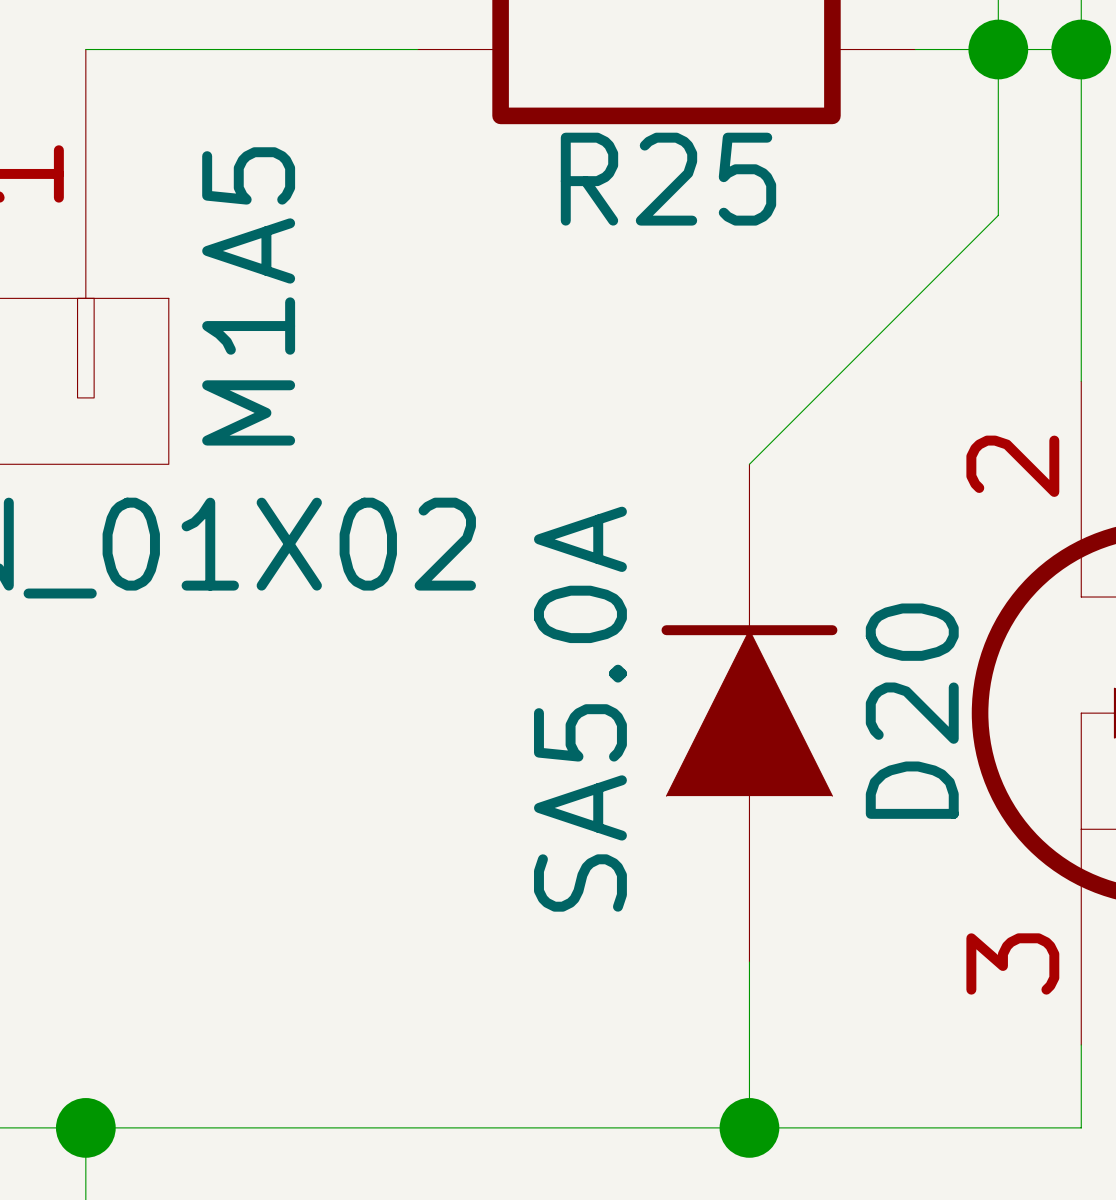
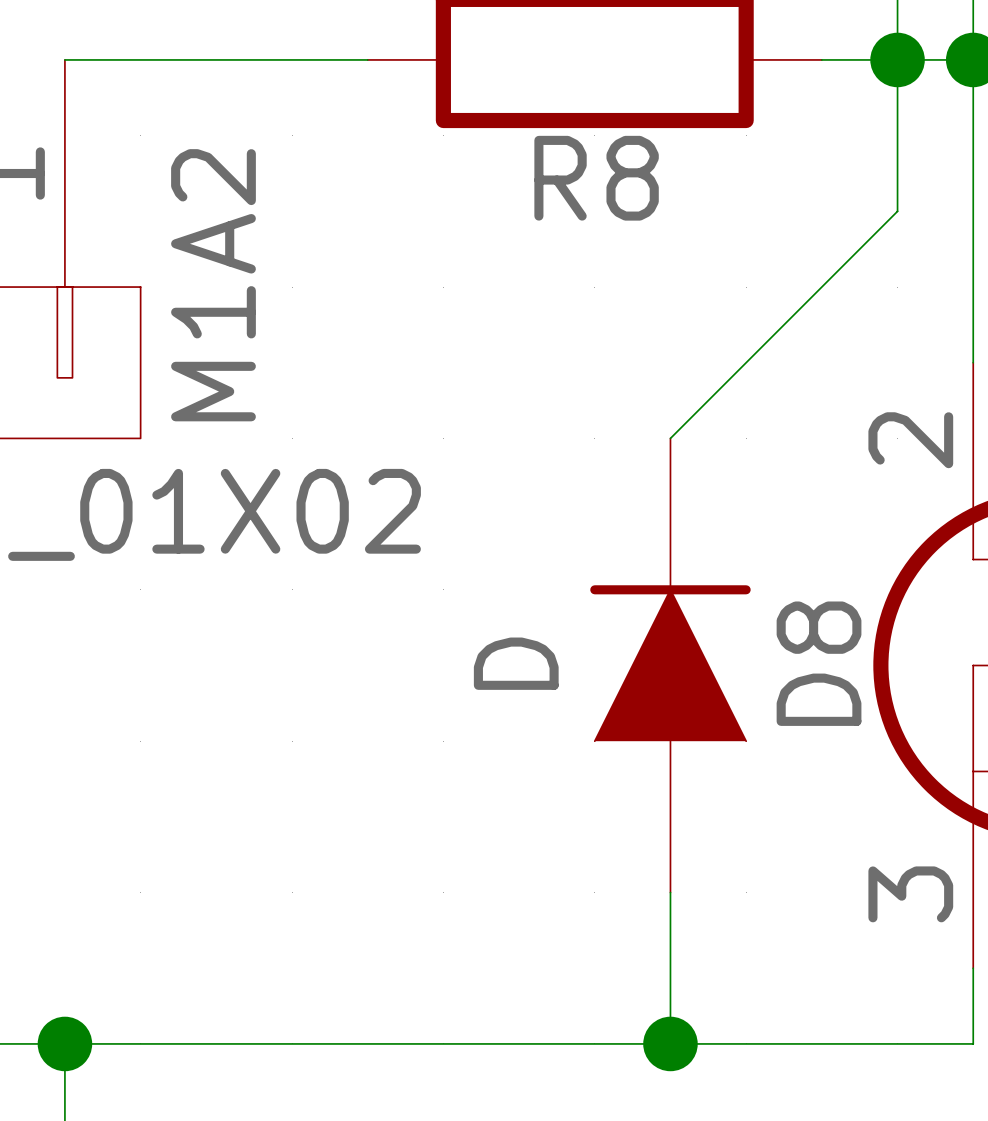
R25 name: R25 (668, 179) -> R8 (596, 178)
M1A5 name: M1A5 (248, 296) -> M1A2 (213, 285)
D20 value: SA5.0A (580, 709) -> D (516, 663)
D20 name: D20 (912, 711) -> D8 (819, 663)

